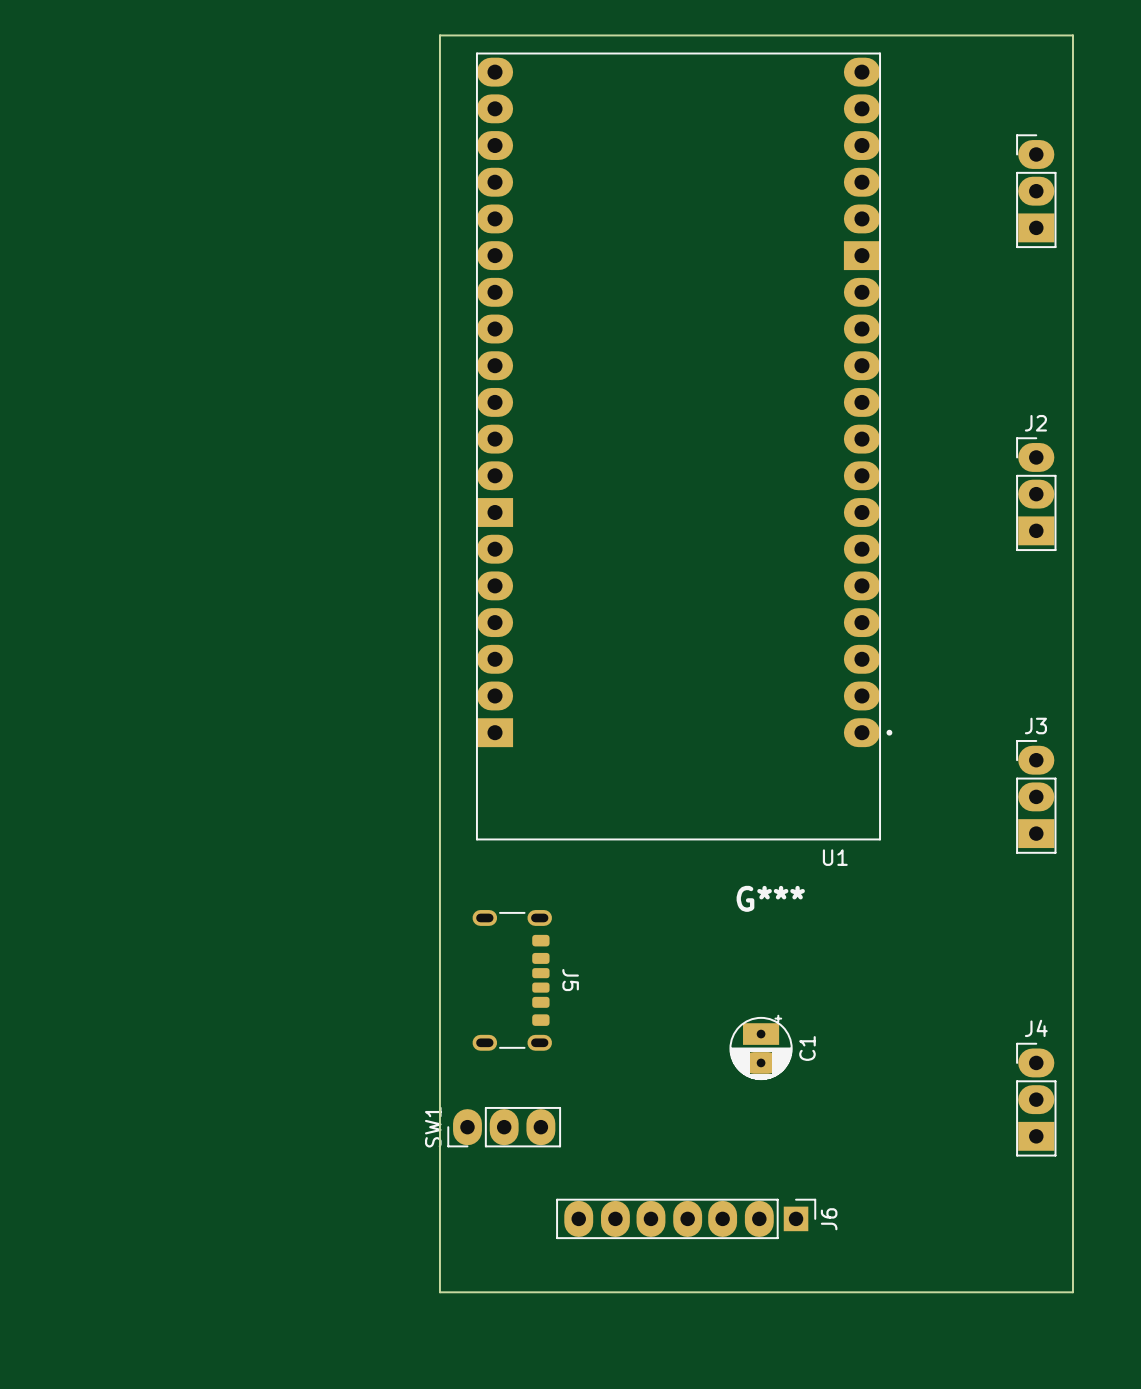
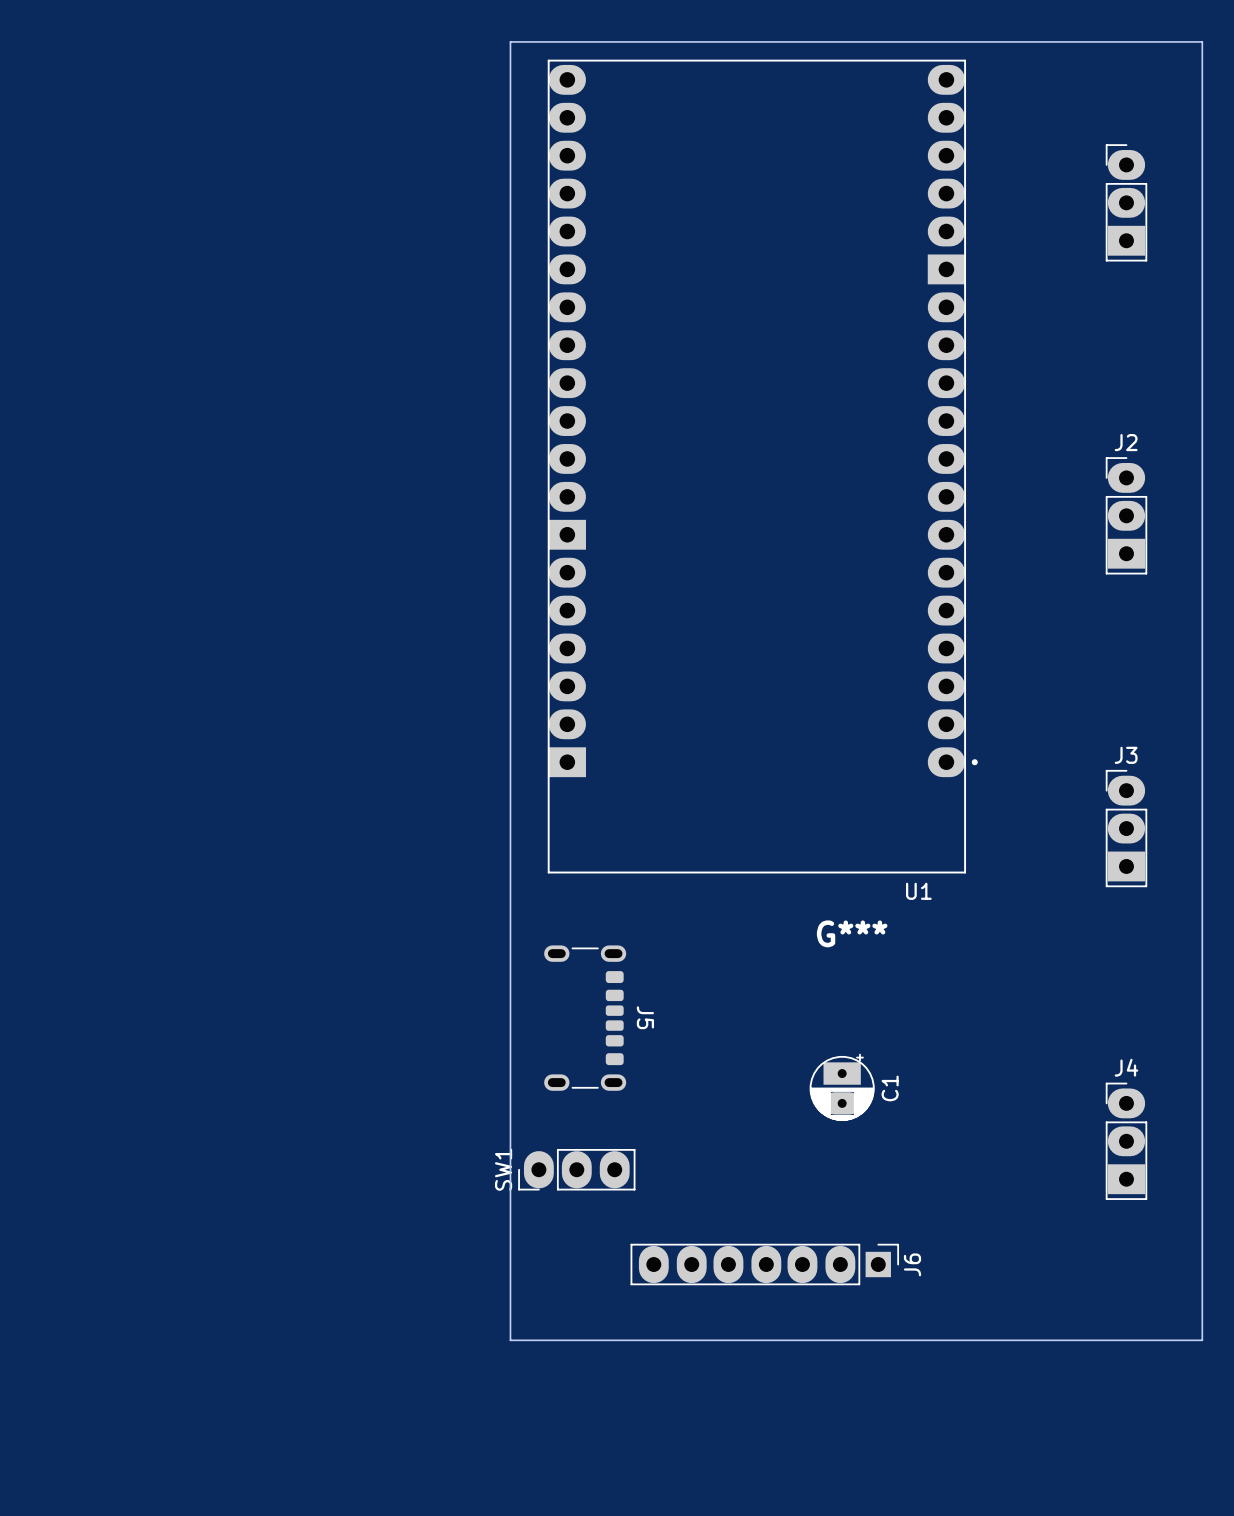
board edge: (1072, 35) (1072, 1292) -> (1164, 41) (1202, 41) (1202, 1340) (1164, 1340)

